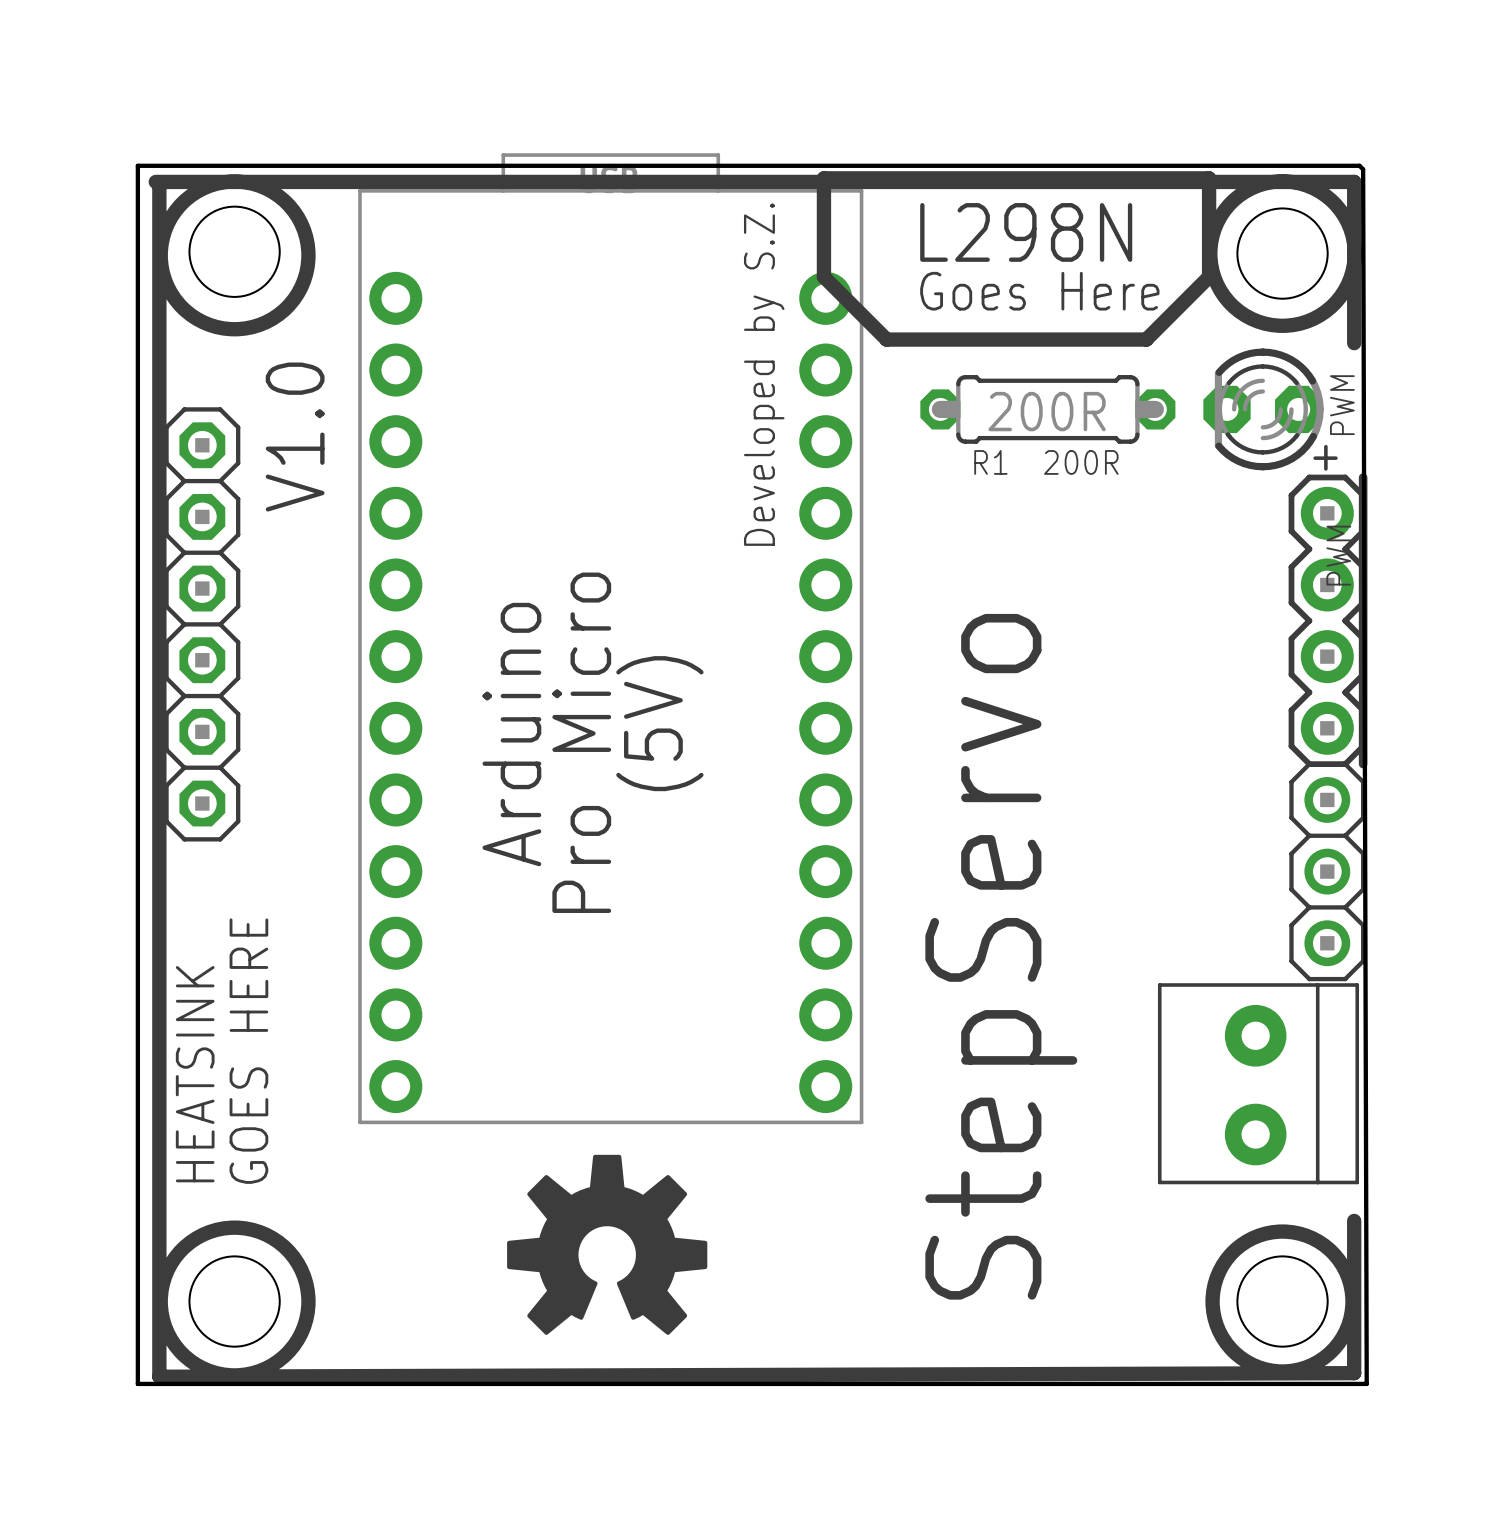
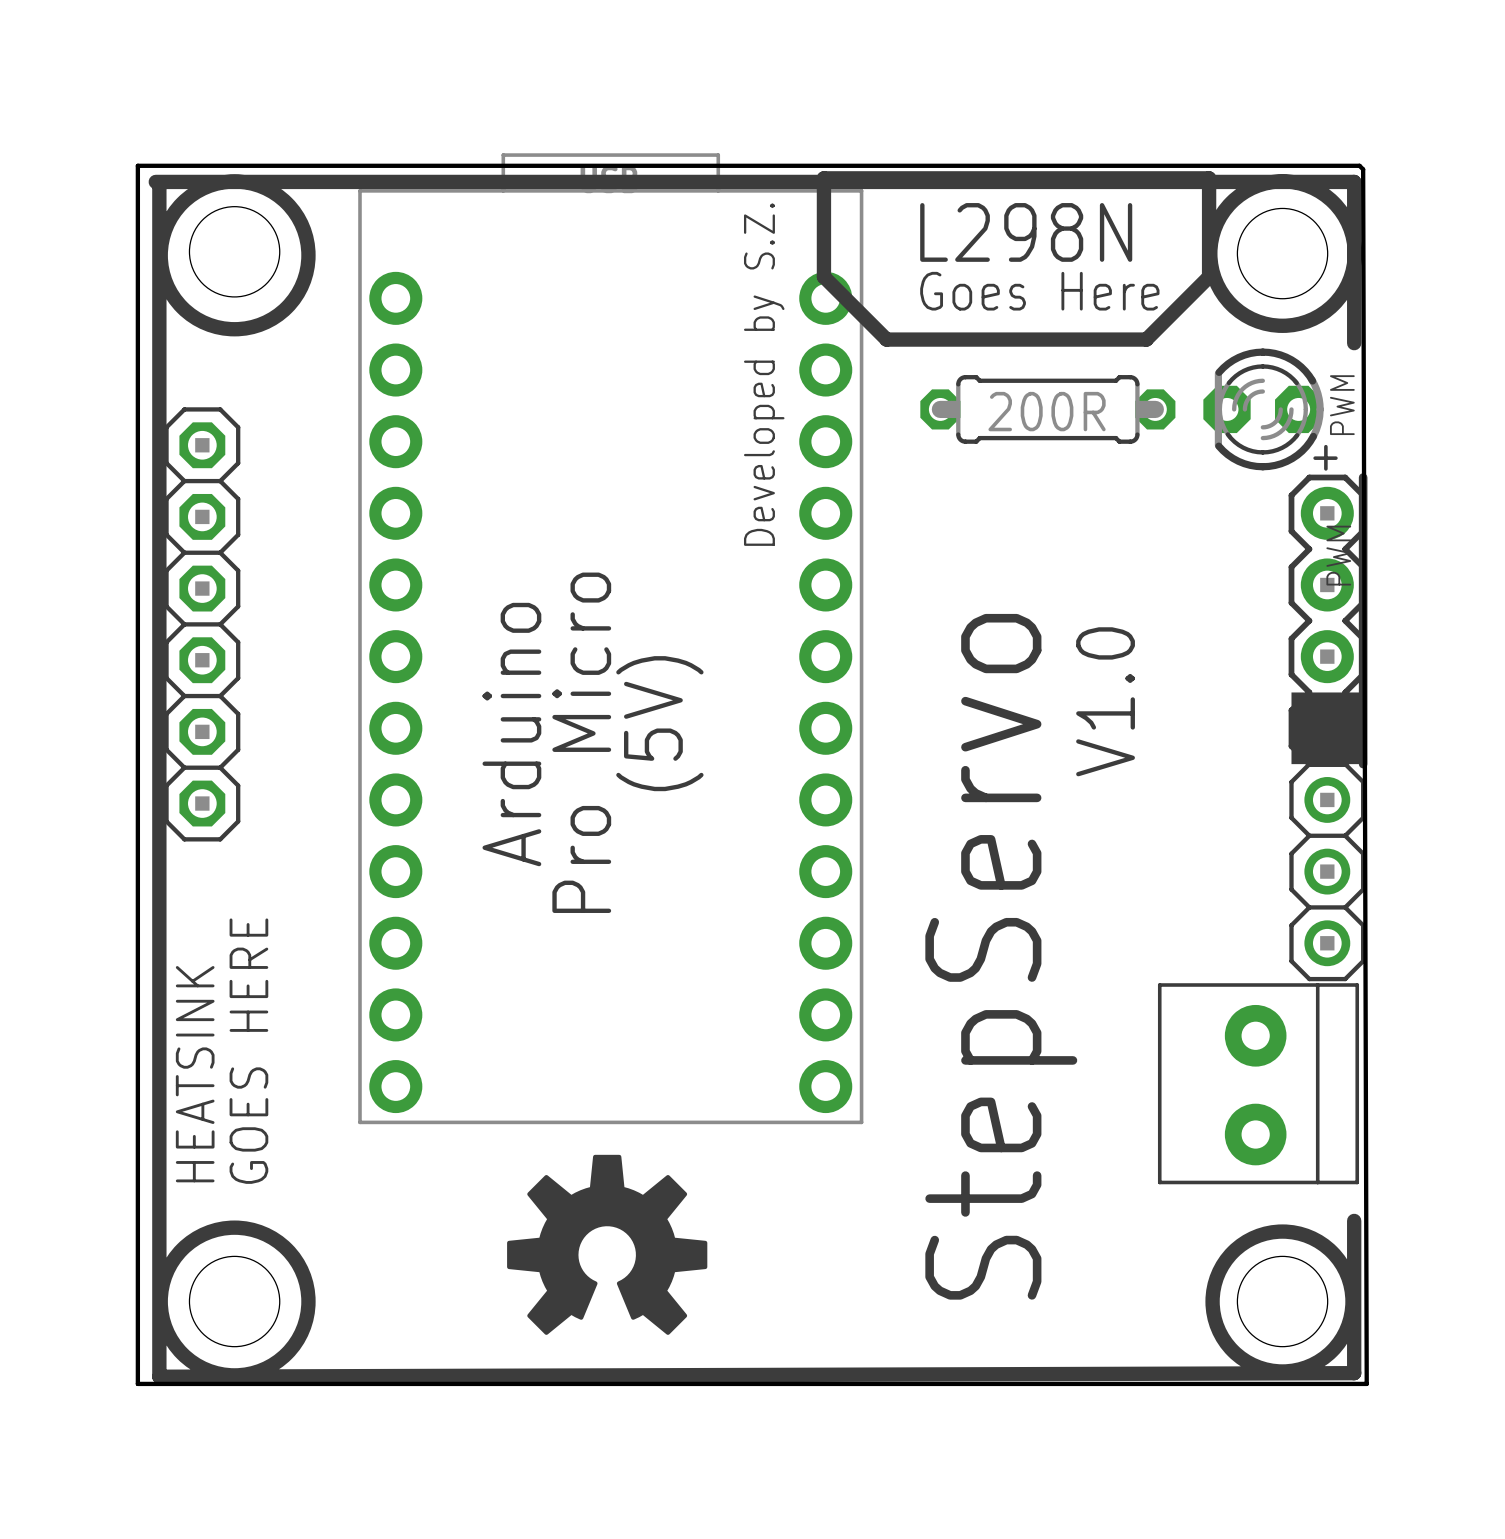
text: V1.0 (295, 437) -> none
text: R1 200R (1046, 462) -> none
drawing: none -> [1291, 692, 1364, 765]
text: none -> V1.0 (1105, 701)

